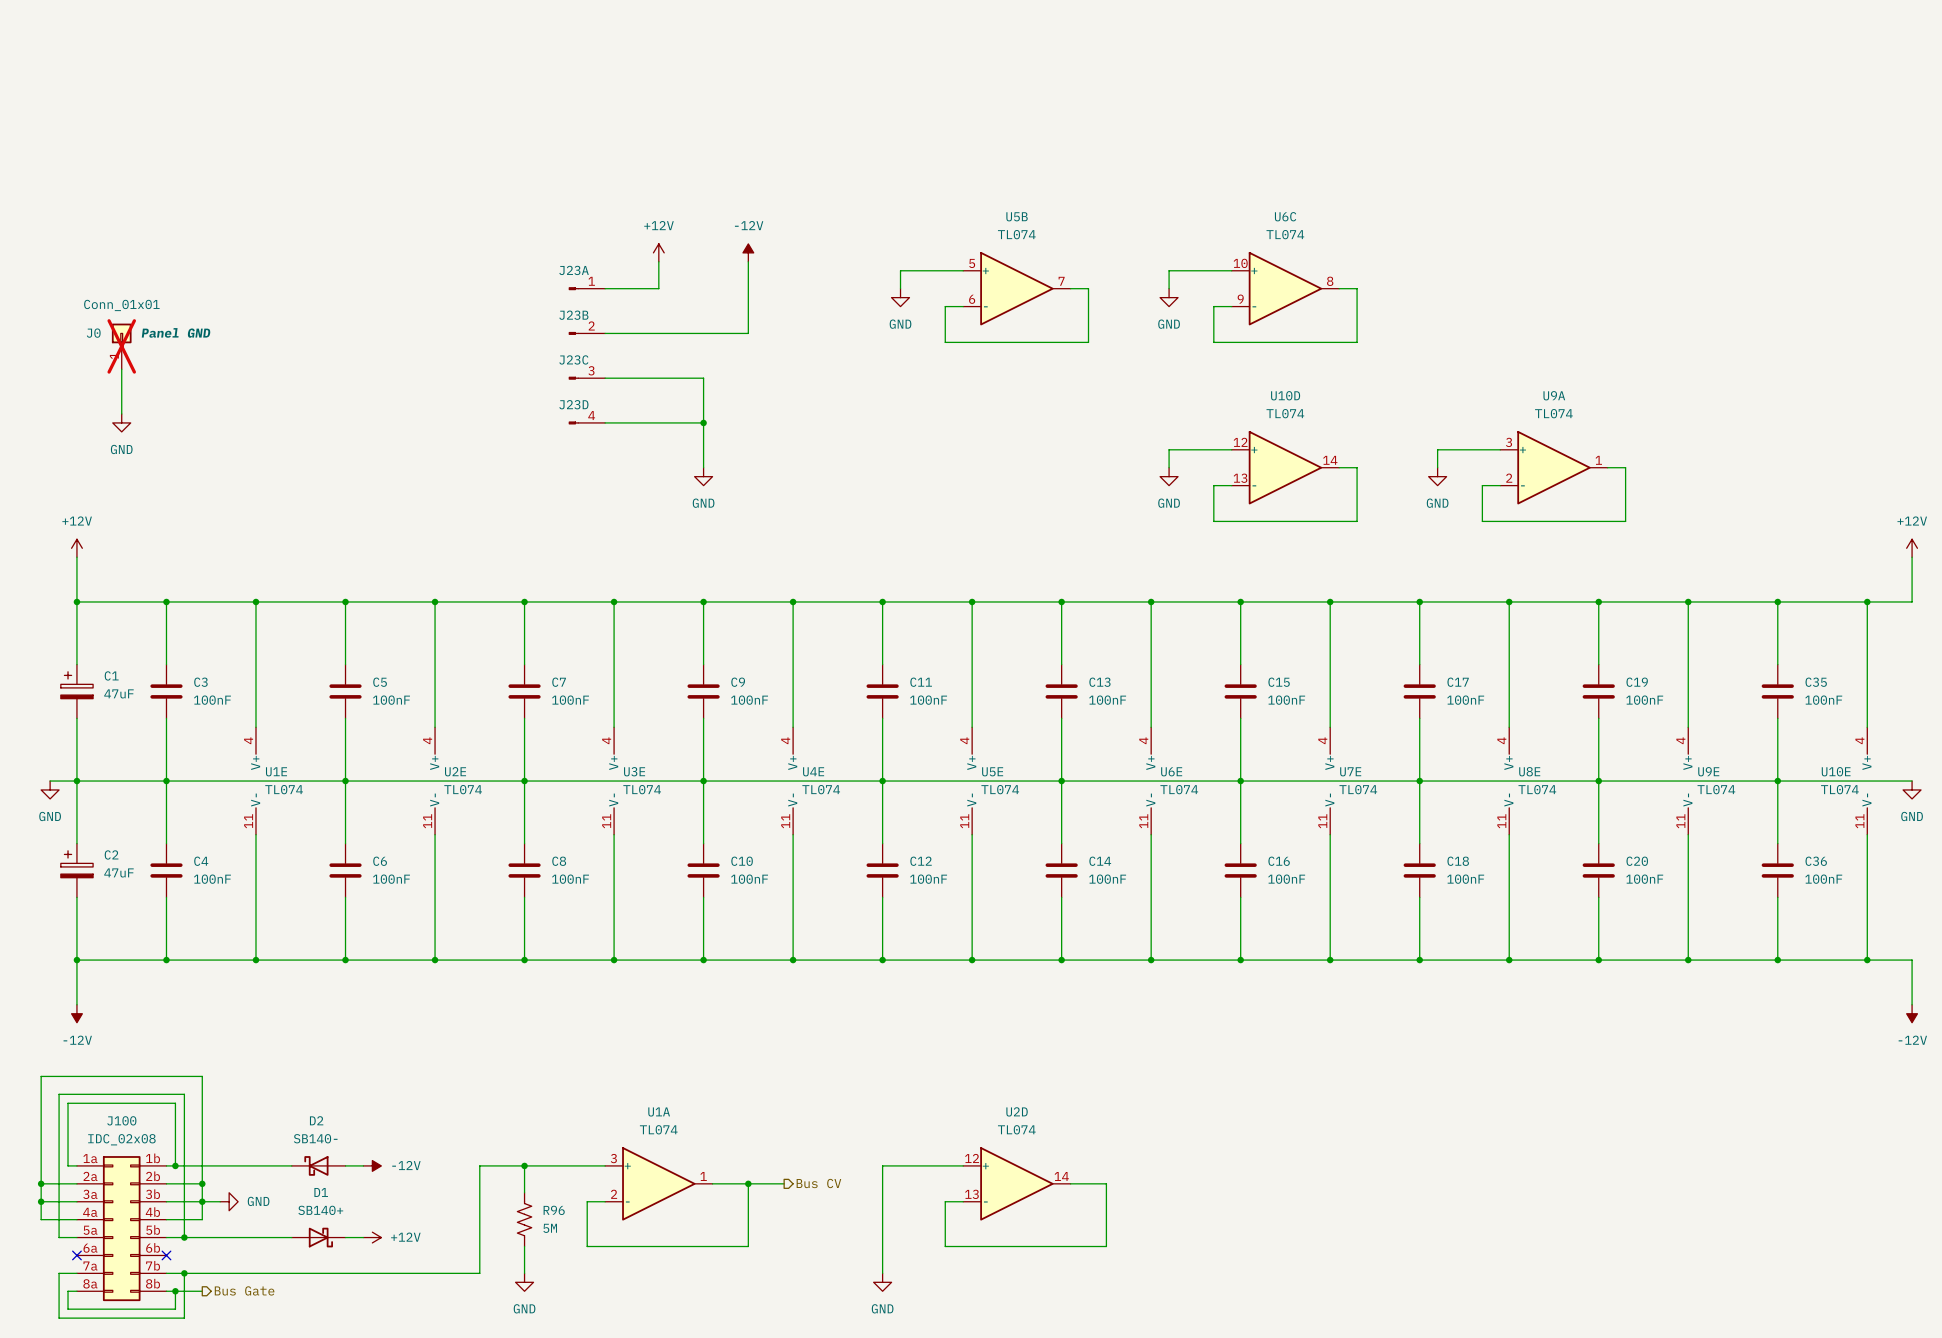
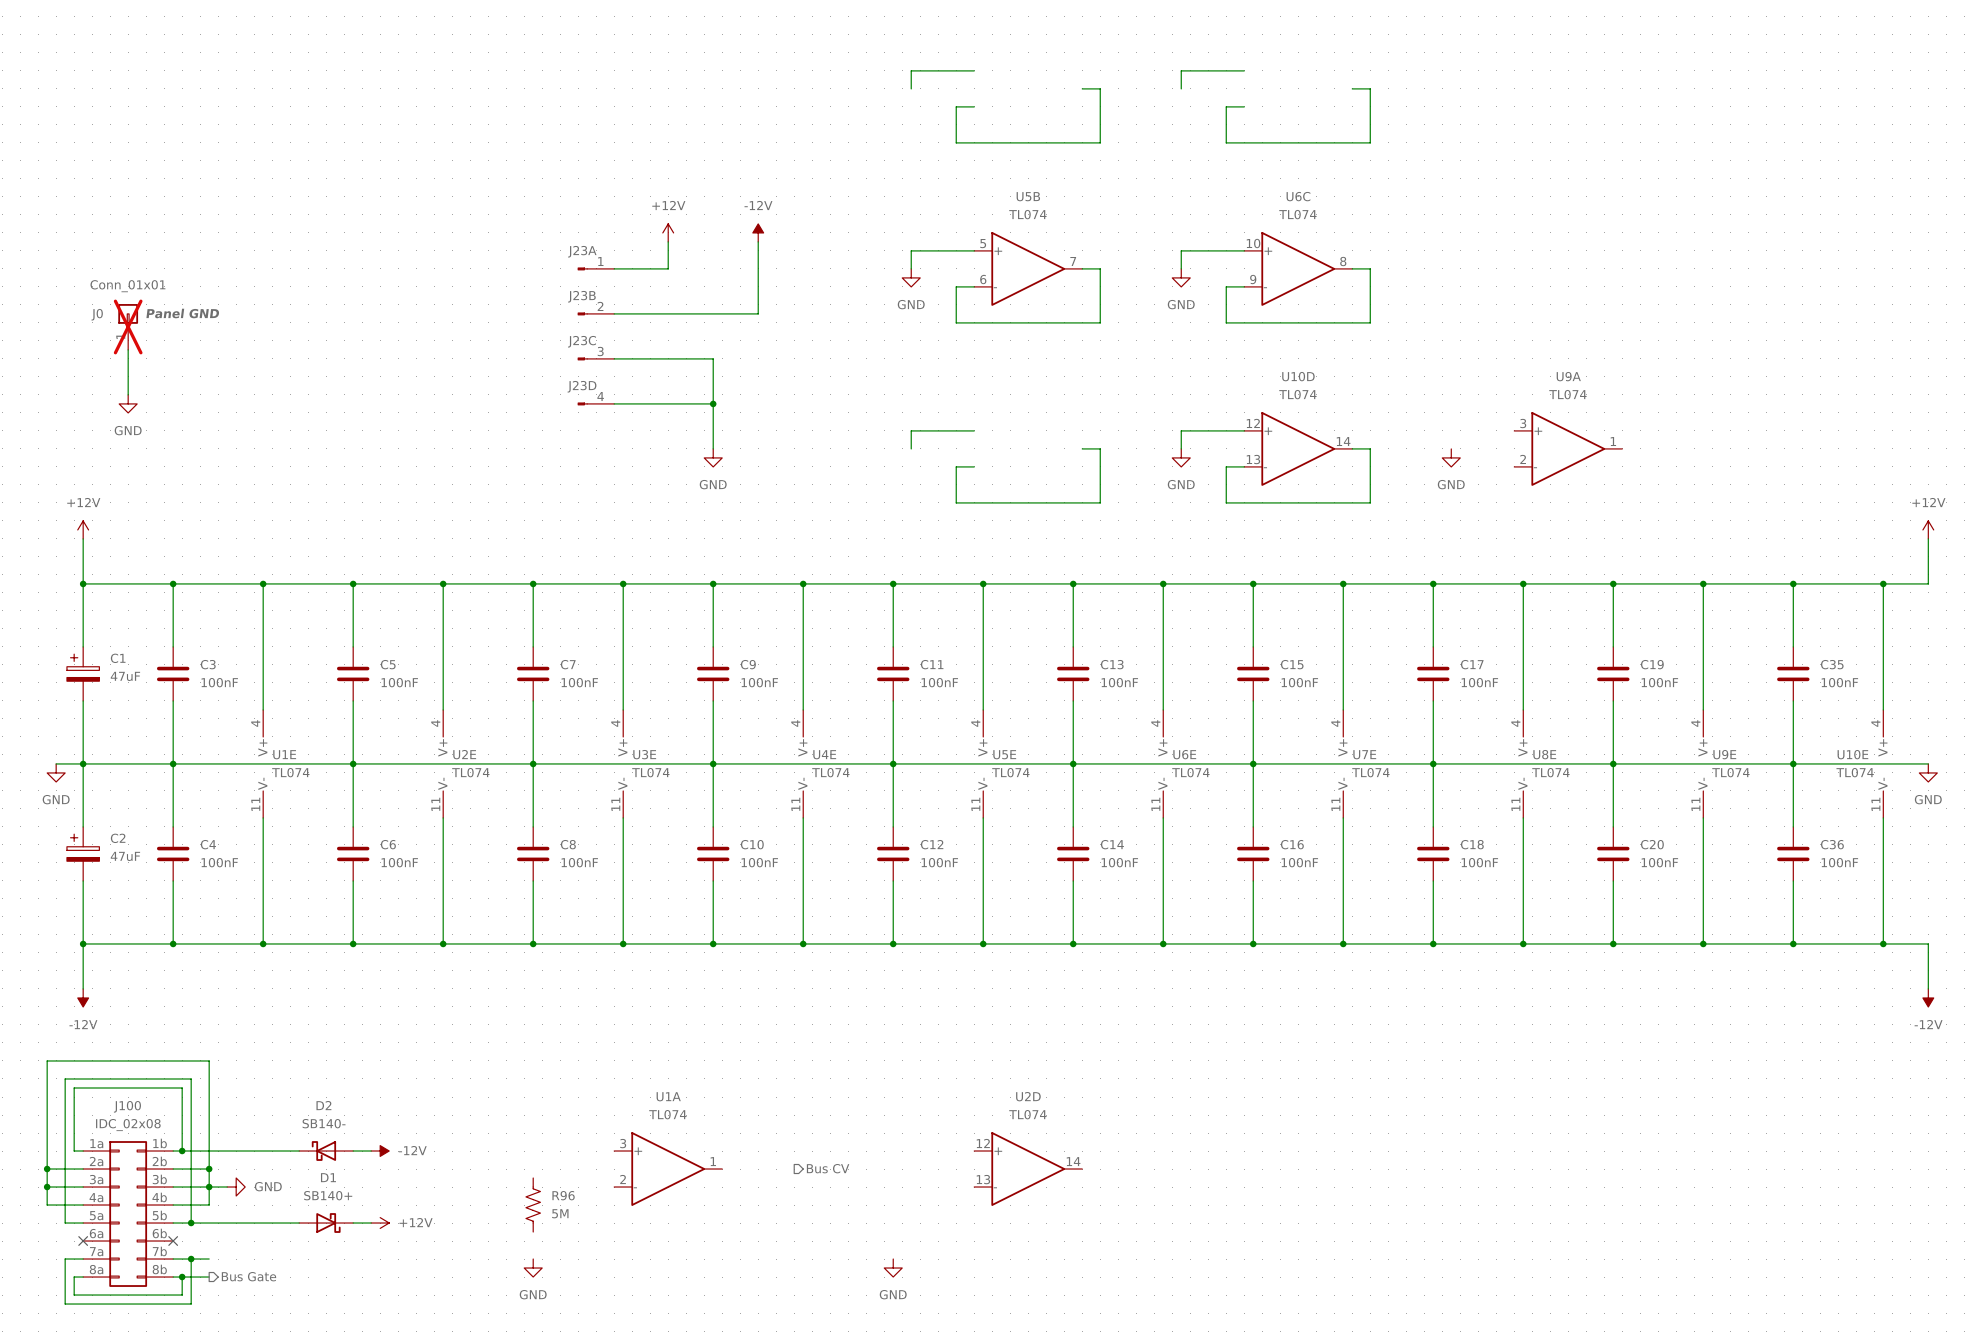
wire: none -> (974, 70) (911, 70) (911, 88)
wire: none -> (1244, 70) (1181, 70) (1181, 88)
wire: none -> (1082, 88) (1100, 88) (1100, 142) (956, 142) (956, 106) (974, 106)
wire: none -> (1352, 88) (1370, 88) (1370, 142) (1226, 142) (1226, 106) (1244, 106)
wire: none -> (974, 430) (911, 430) (911, 448)
wire: (1500, 449) (1437, 449) (1437, 467) -> none
wire: none -> (1082, 448) (1100, 448) (1100, 502) (956, 502) (956, 466) (974, 466)
wire: (1607, 467) (1625, 467) (1625, 521) (1482, 521) (1482, 485) (1500, 485) -> none
wire: (524, 1165) (524, 1192) -> none
junction: (524, 1165) -> none
wire: (605, 1165) (479, 1165) (479, 1273) (202, 1273) -> none
wire: (963, 1165) (882, 1165) (882, 1273) -> none
wire: (712, 1183) (784, 1183) -> none
wire: (748, 1183) (748, 1246) (587, 1246) (587, 1201) (605, 1201) -> none
junction: (748, 1183) -> none
wire: (1070, 1183) (1106, 1183) (1106, 1246) (945, 1246) (945, 1201) (963, 1201) -> none
wire: (524, 1246) (524, 1273) -> none

